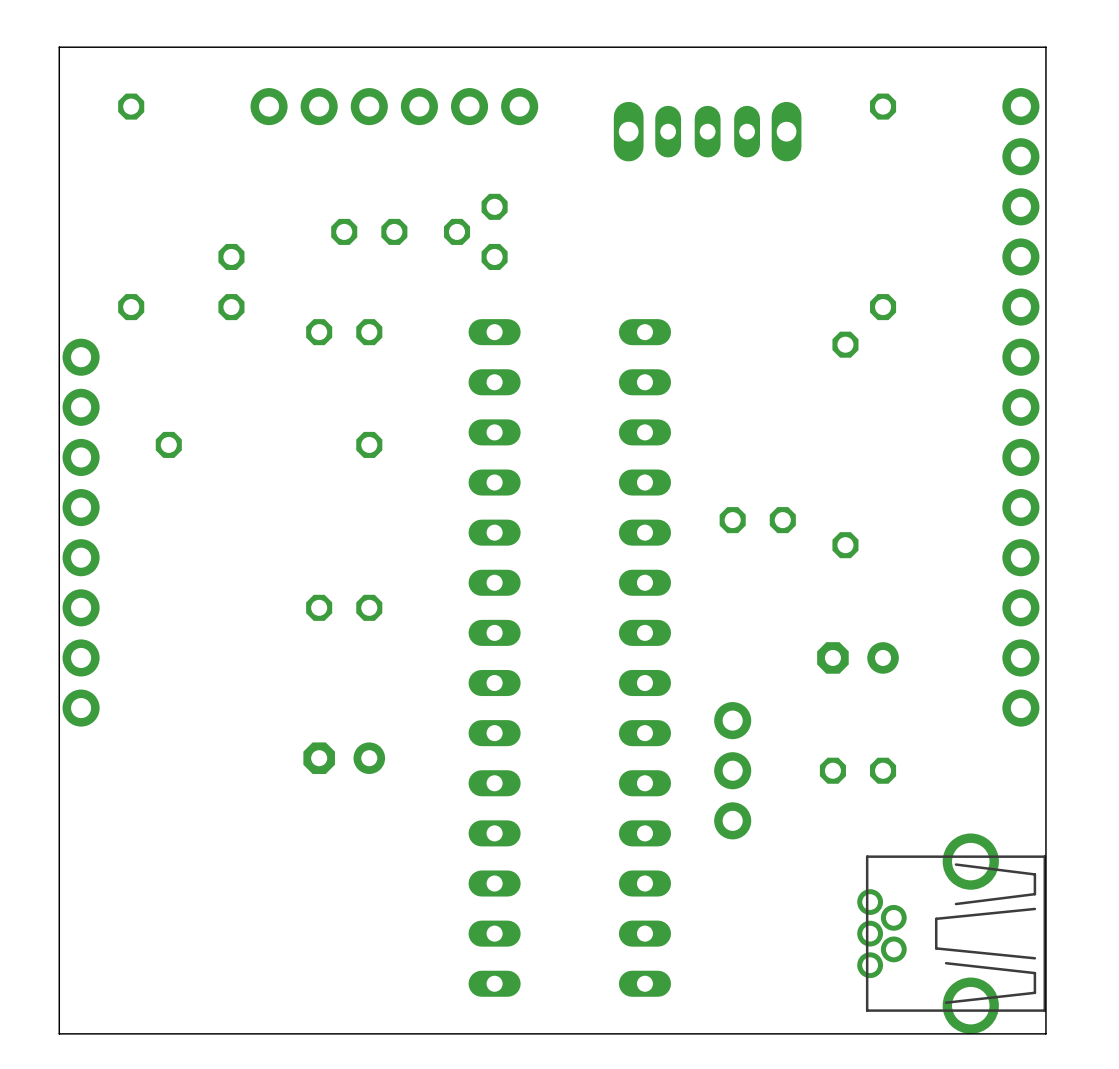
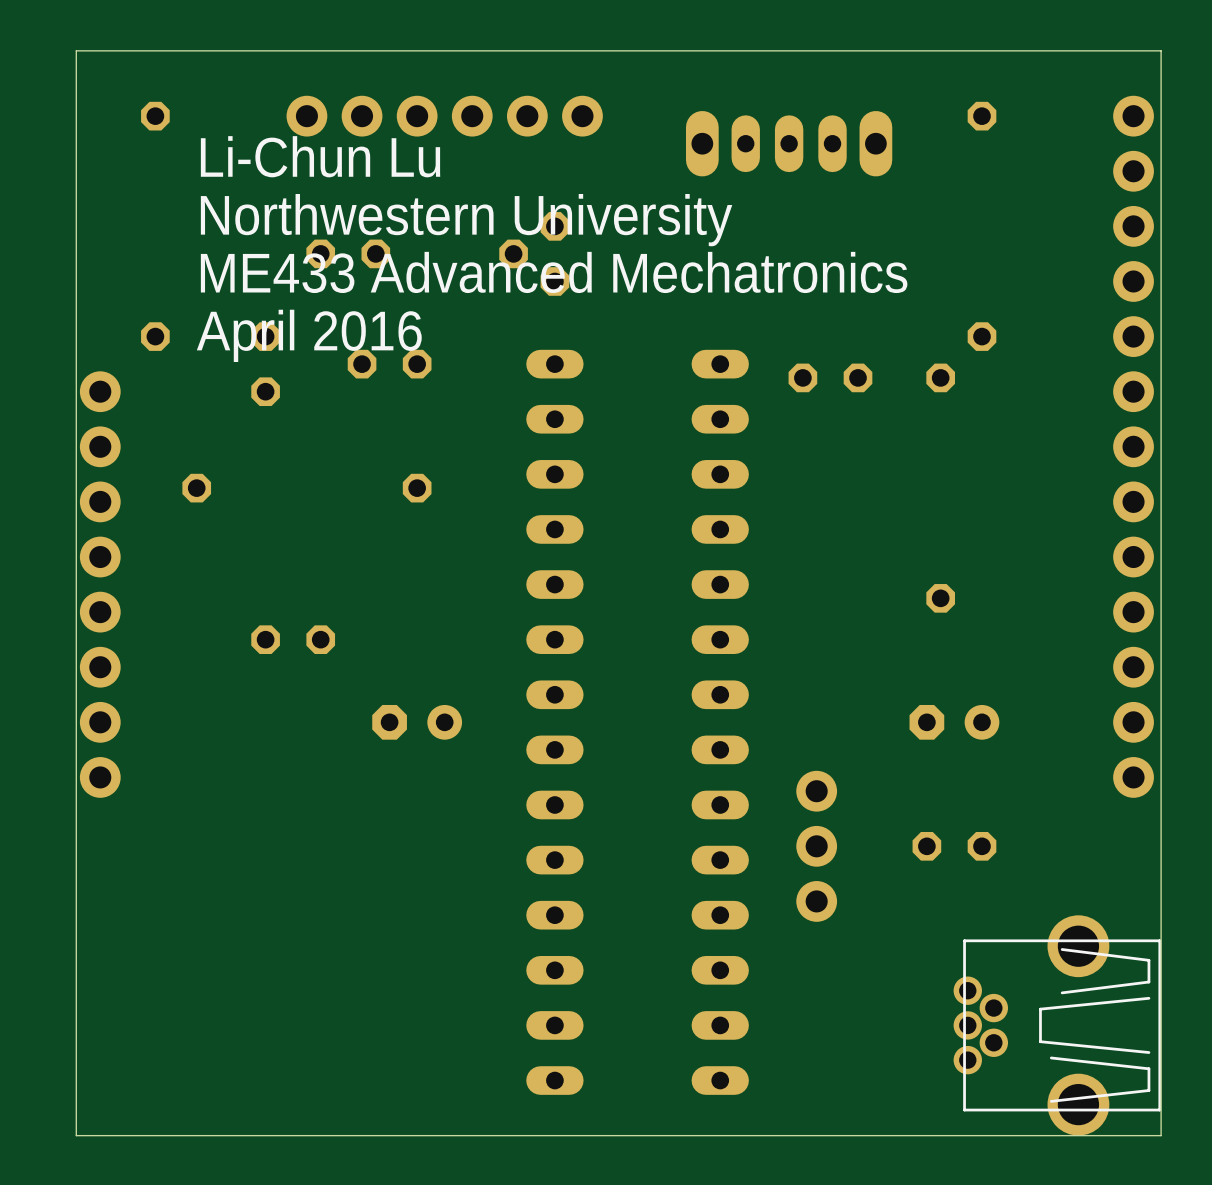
text: none -> Li-Chun Lu (320, 156)
text: none -> Northwestern University (466, 220)
part: none -> (348, 253)
part: (369, 231) -> none
text: none -> ME433 Advanced Mechatronics (554, 272)
part: (231, 282) -> none
text: none -> April 2016 (309, 335)
part: none -> (265, 364)
part position: (757, 520) -> (830, 377)
part position: (344, 607) -> (293, 639)
part position: (344, 758) -> (417, 722)

